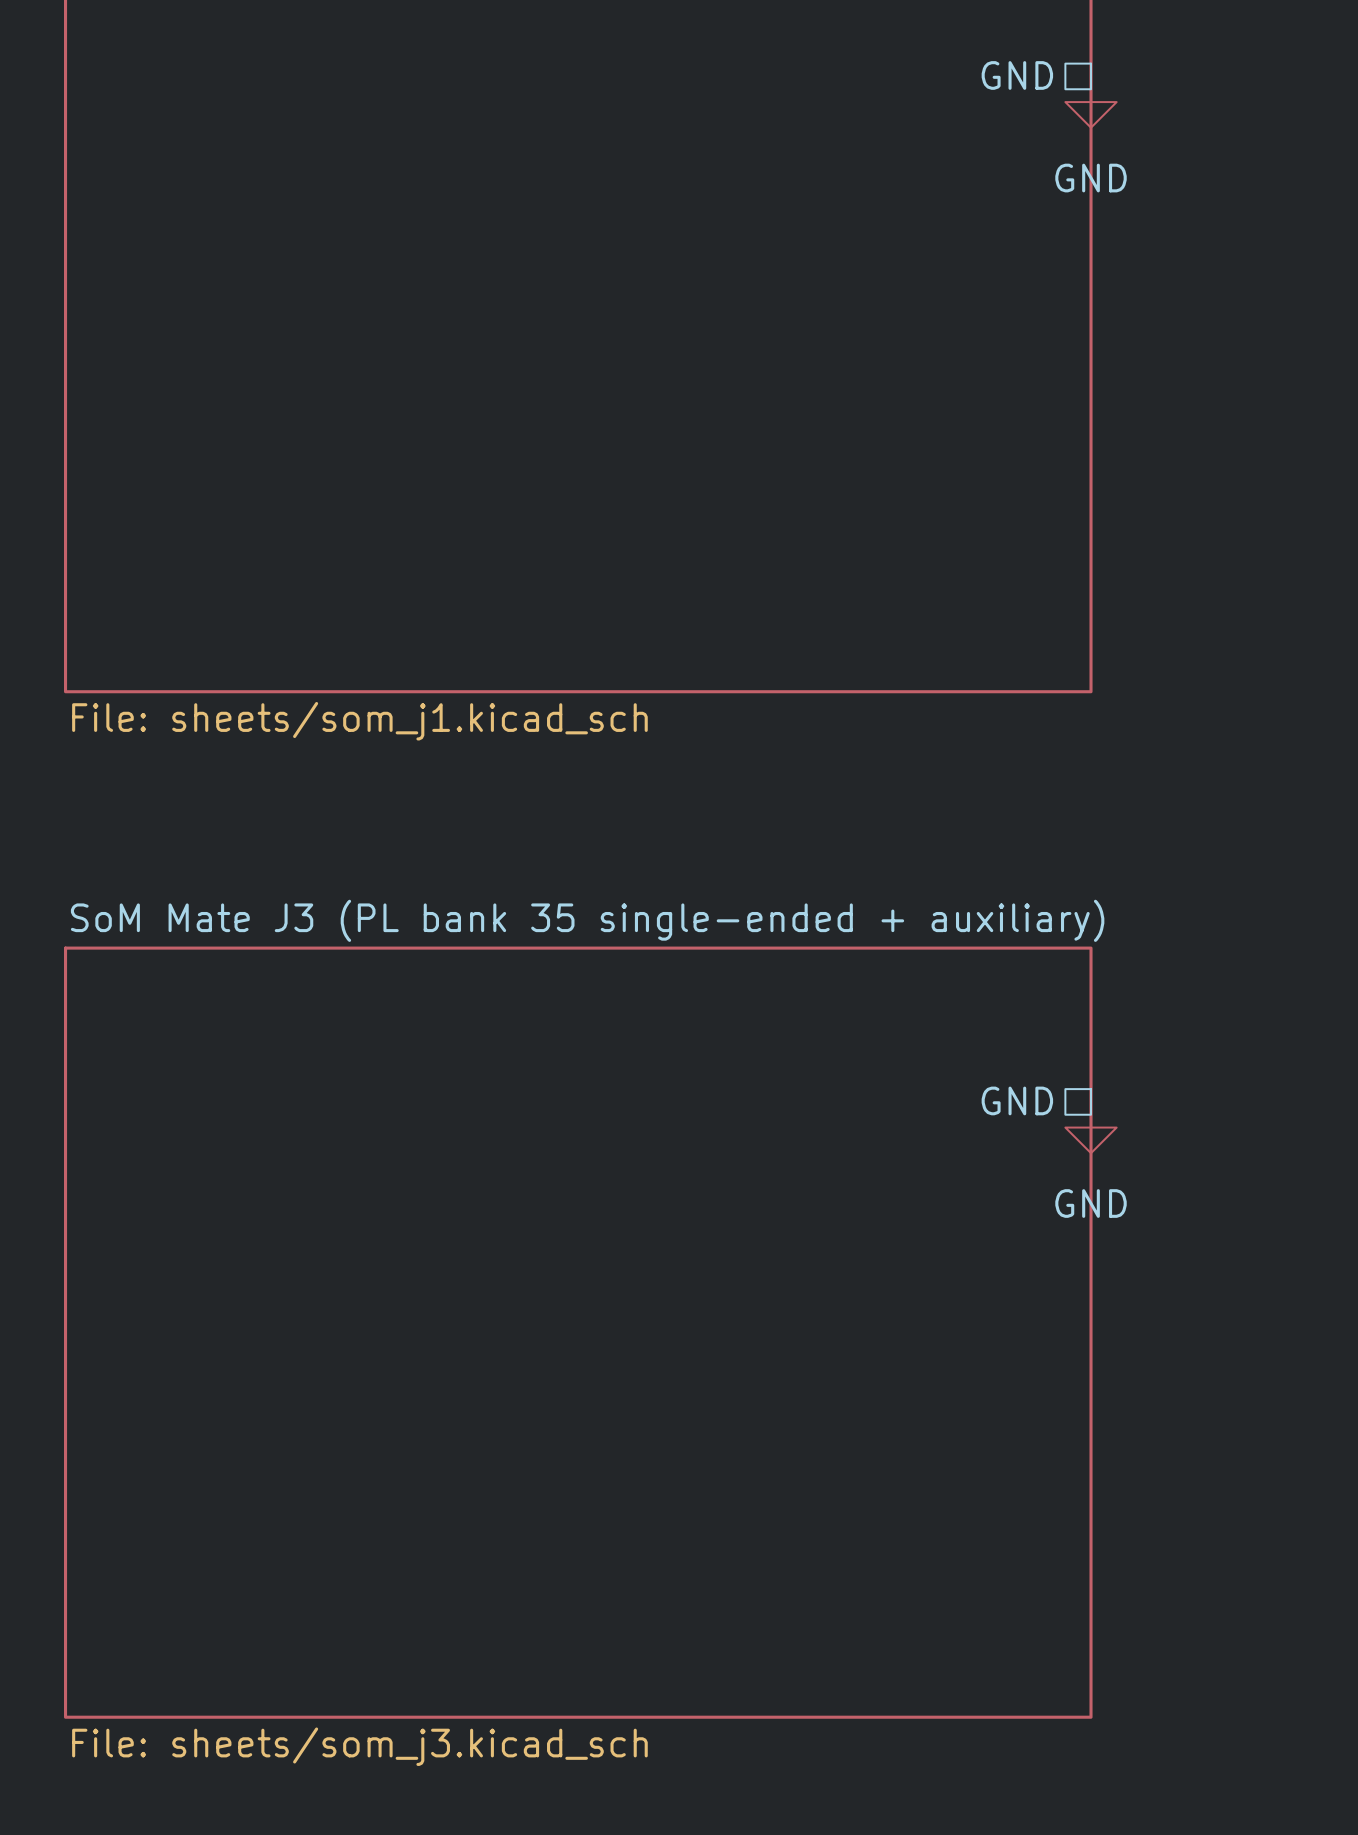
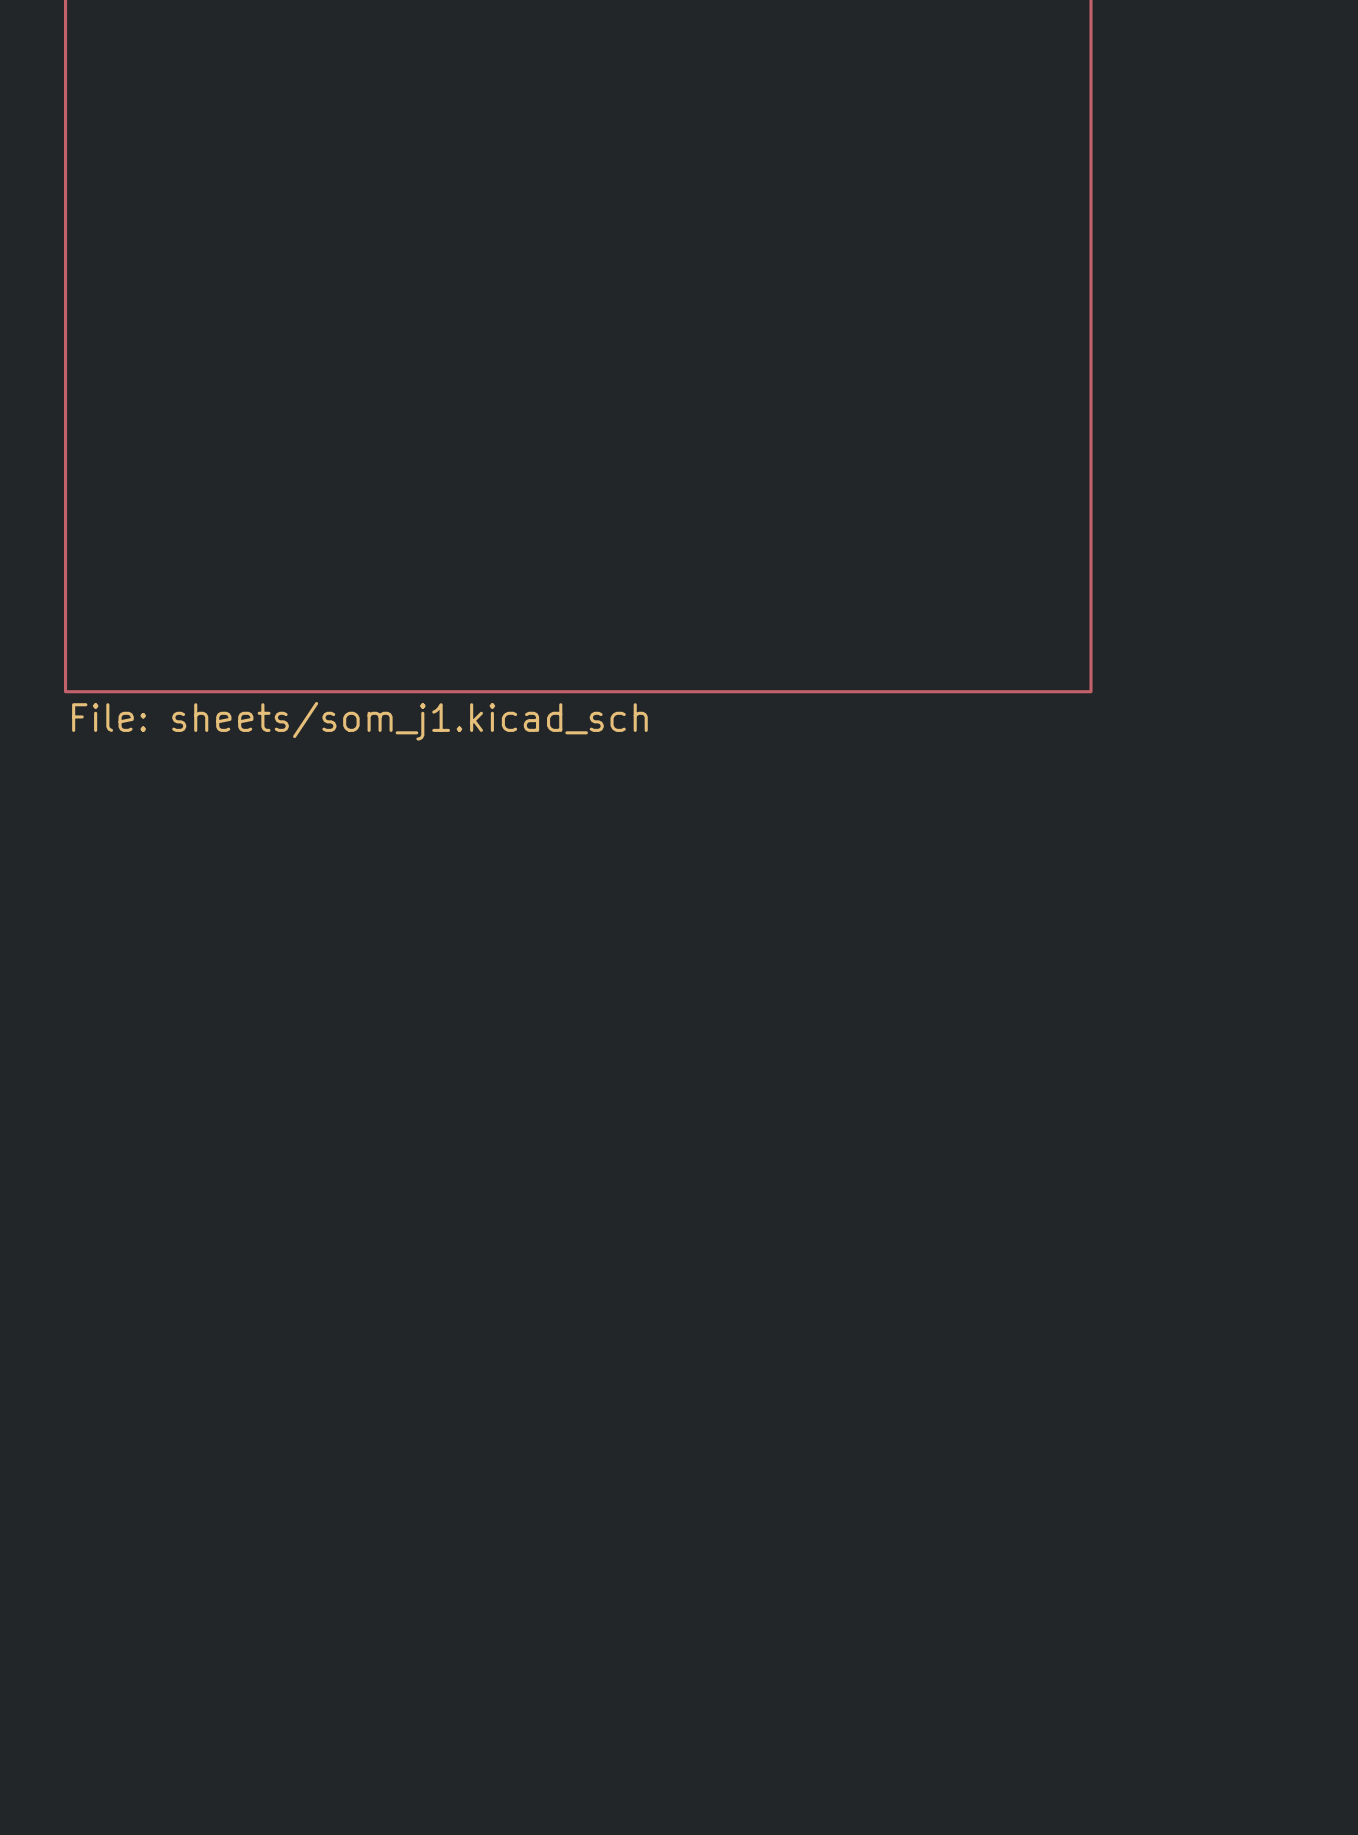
sheet pin: GND (1017, 75) -> none
power symbol: GND (1091, 102) -> none
sheet pin: GND (1017, 1100) -> none
power symbol: GND (1091, 1127) -> none
sheet SoM Mate J3 (PL bank 35 single-ended + auxiliary): File: sheets/som_j3.kicad_sch (578, 1332) -> none

